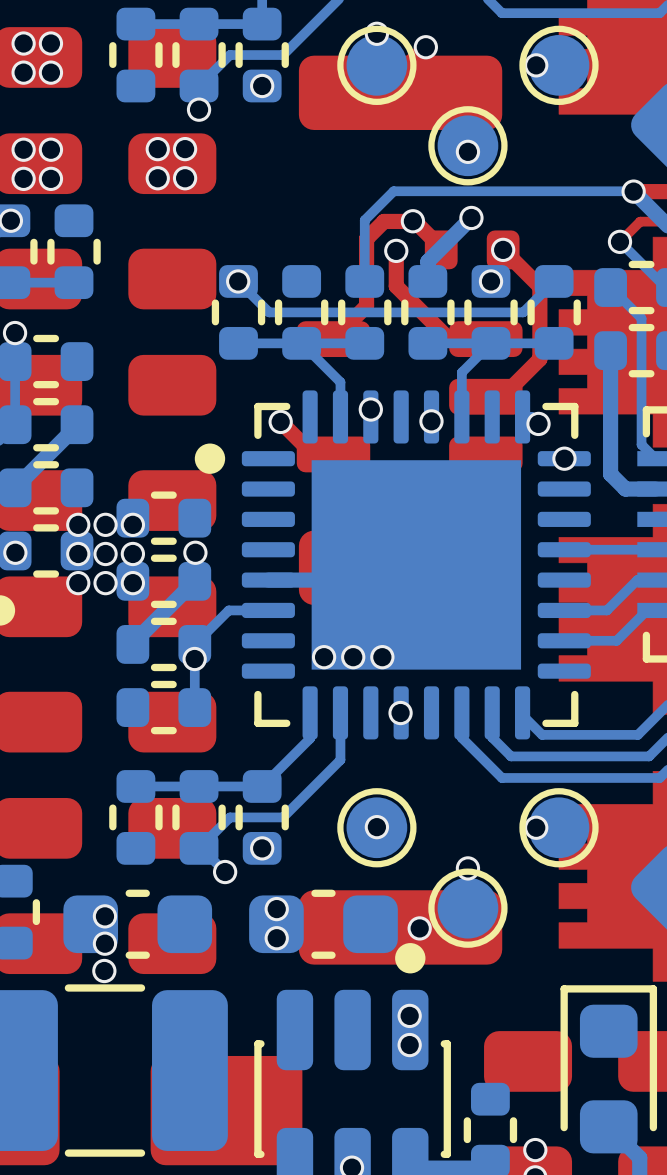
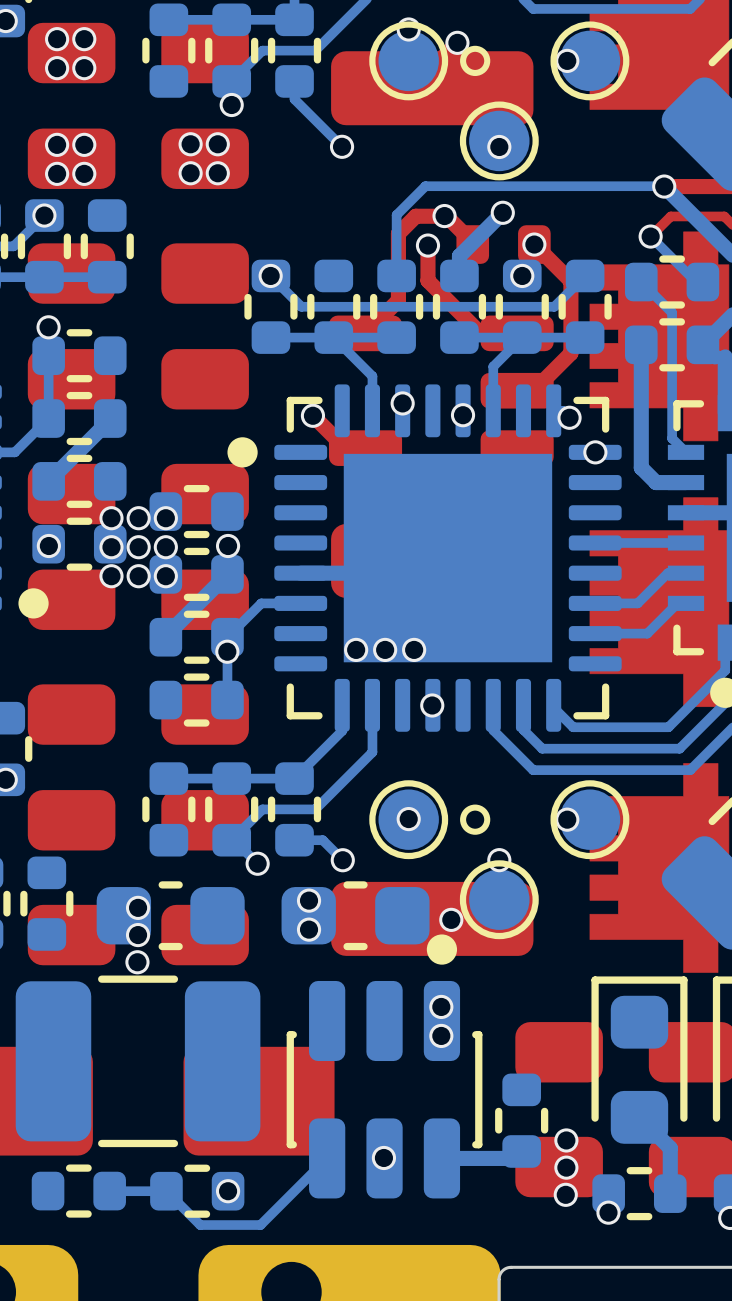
drawing: none -> [460, 45, 491, 77]
bottom track: none -> (294, 81) (294, 99) (342, 146)
via position: (262, 85) -> (342, 146)
drawing: none -> [460, 804, 491, 835]
bottom track: none -> (294, 840) (322, 840) (342, 860)
via position: (262, 848) -> (342, 860)

